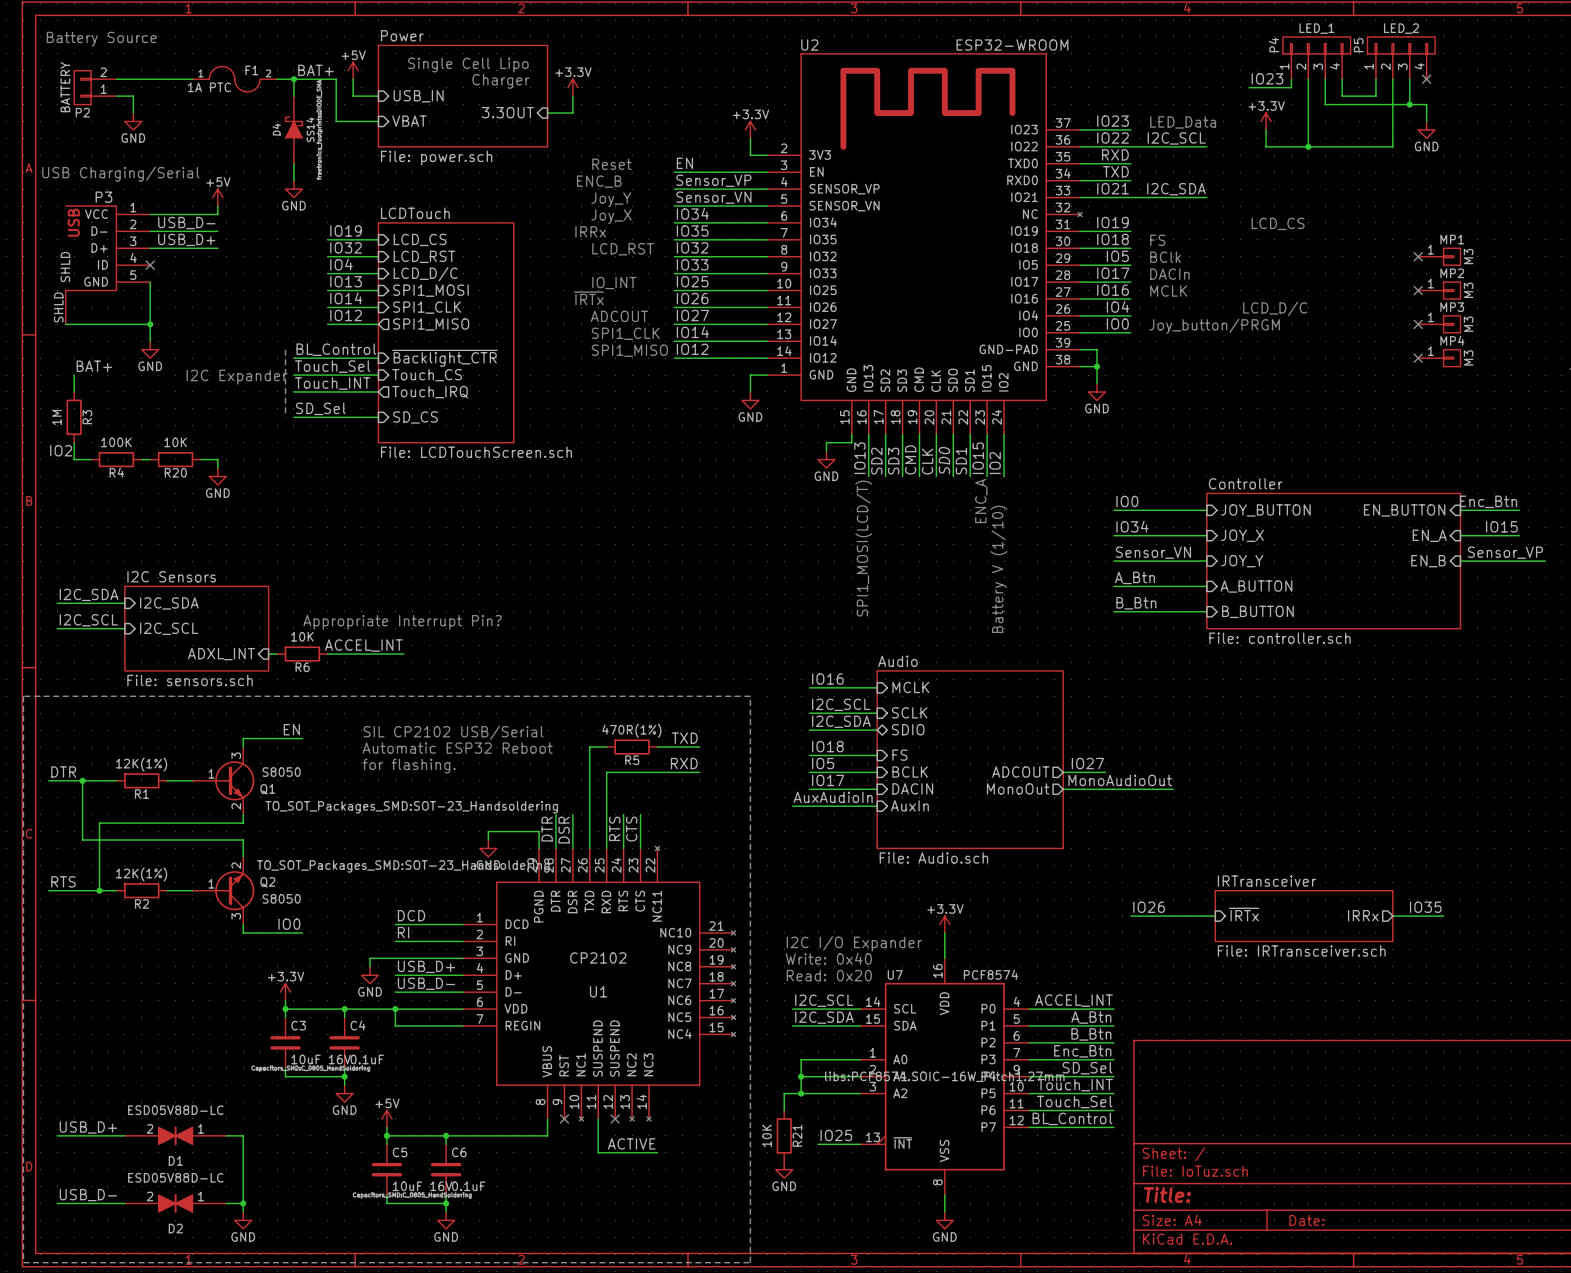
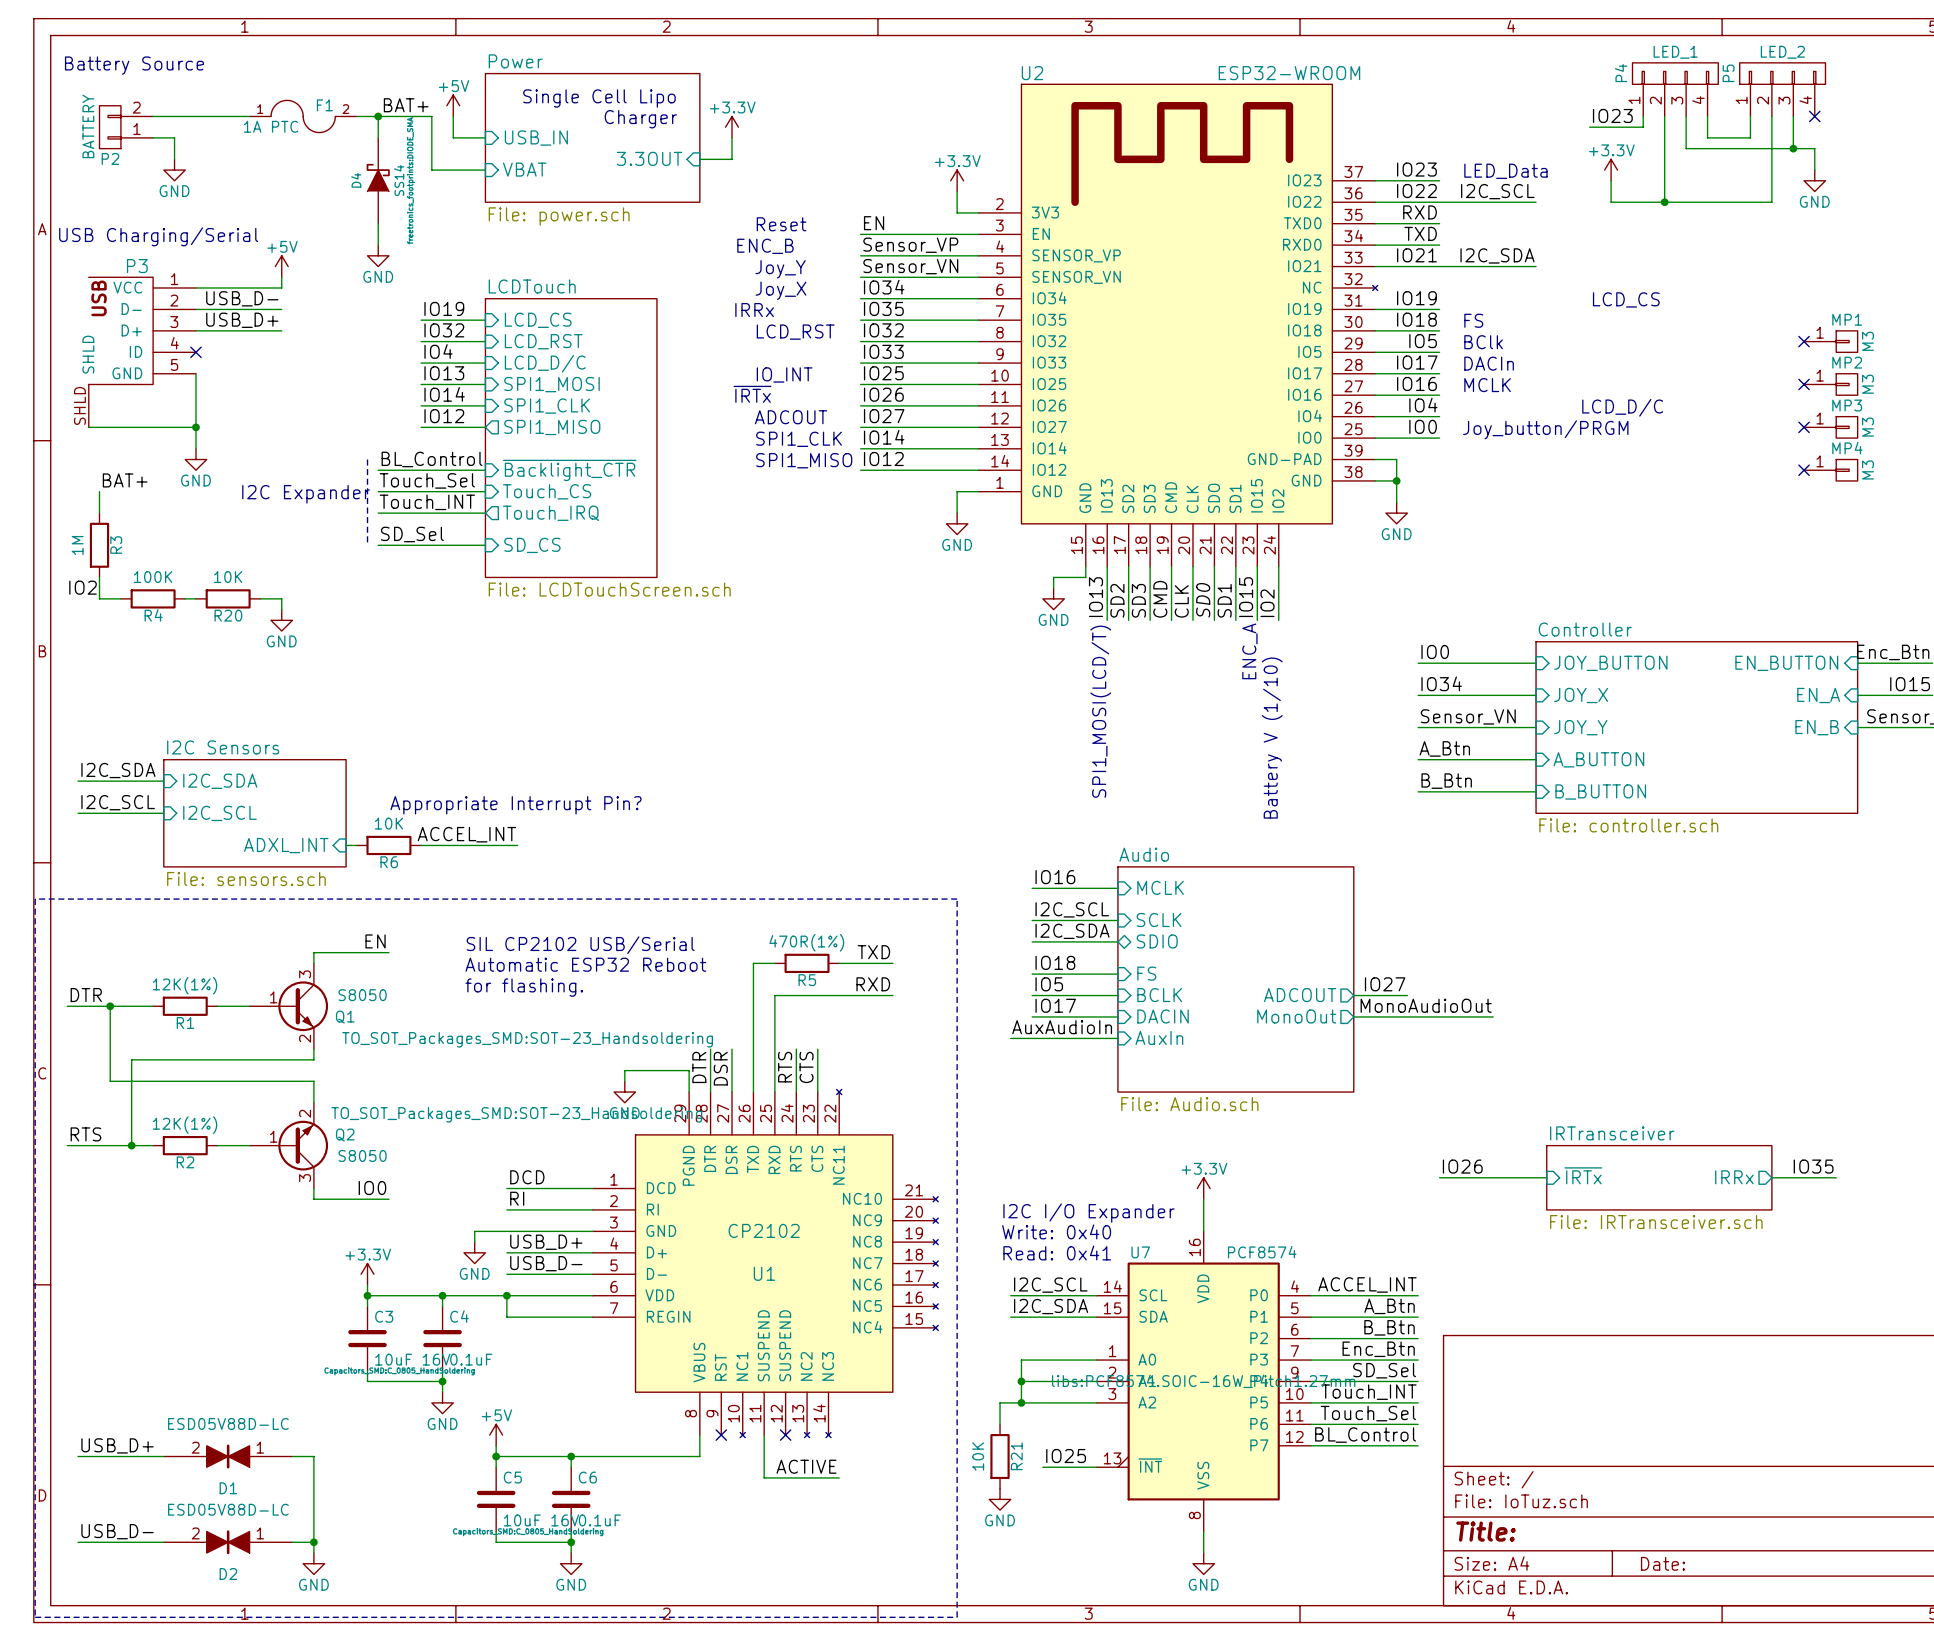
text: Read: 0x20 (829, 975) -> Read: 0x41 (1057, 1252)

